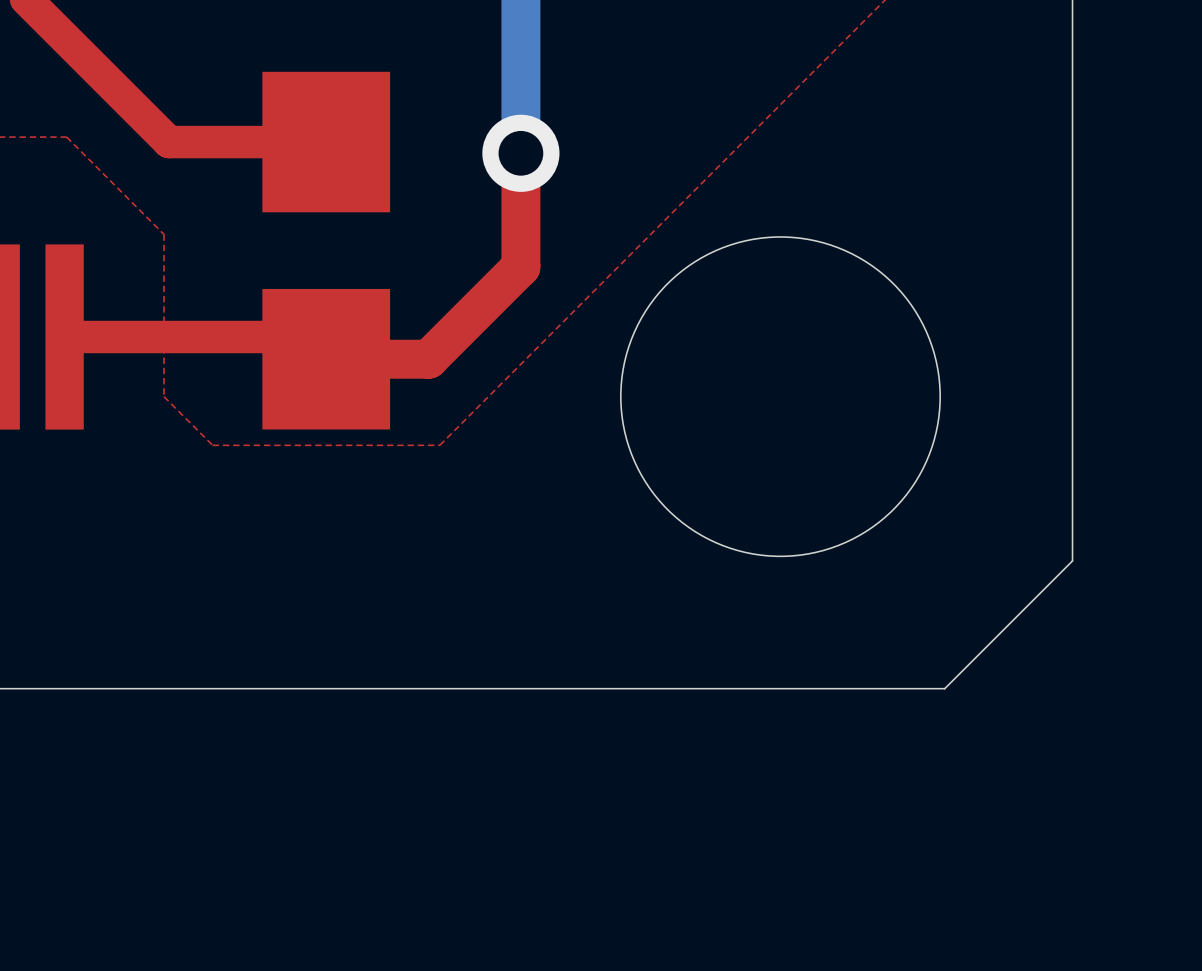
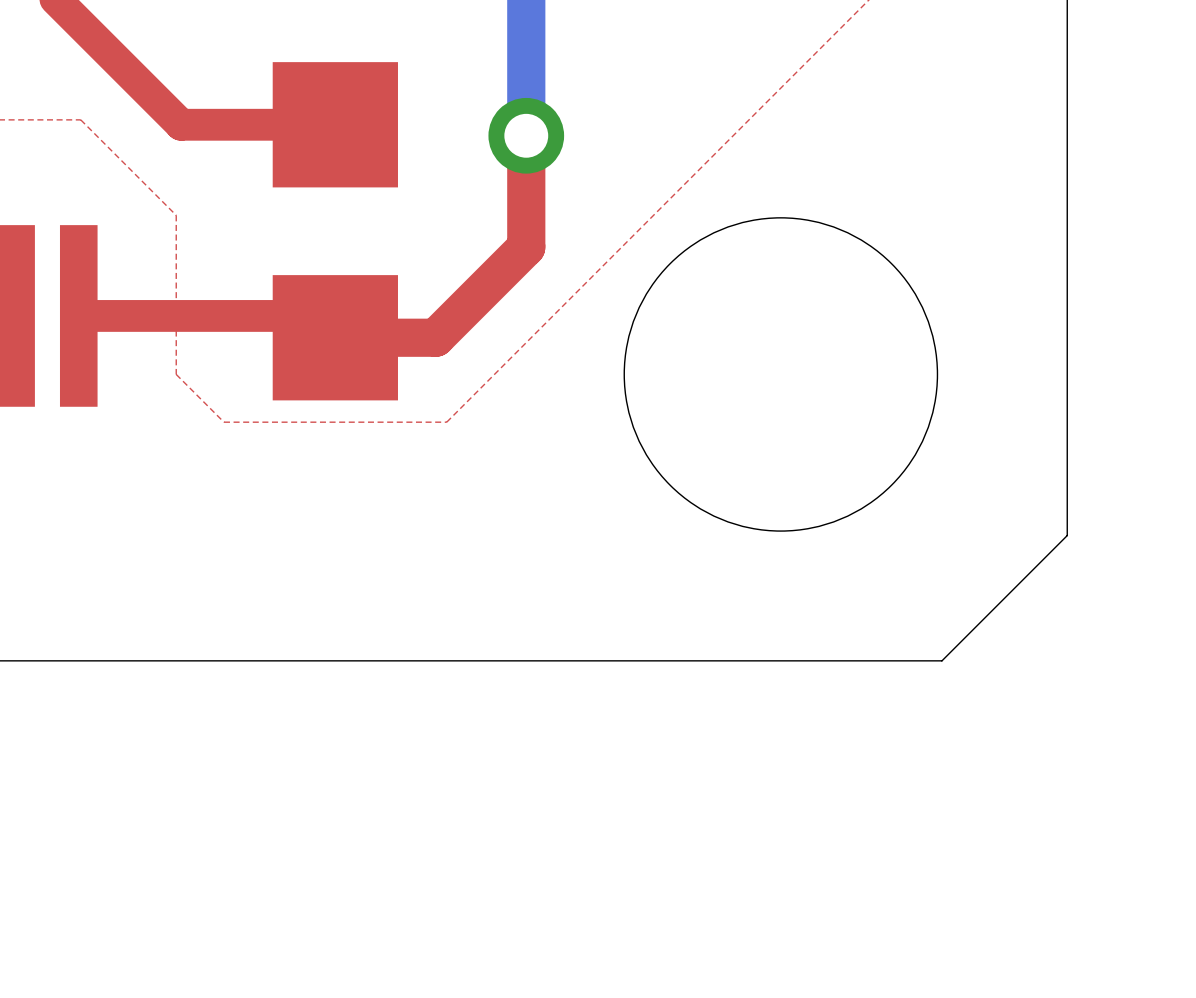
part footprint: [262, 71, 391, 430] -> [272, 62, 398, 401]

